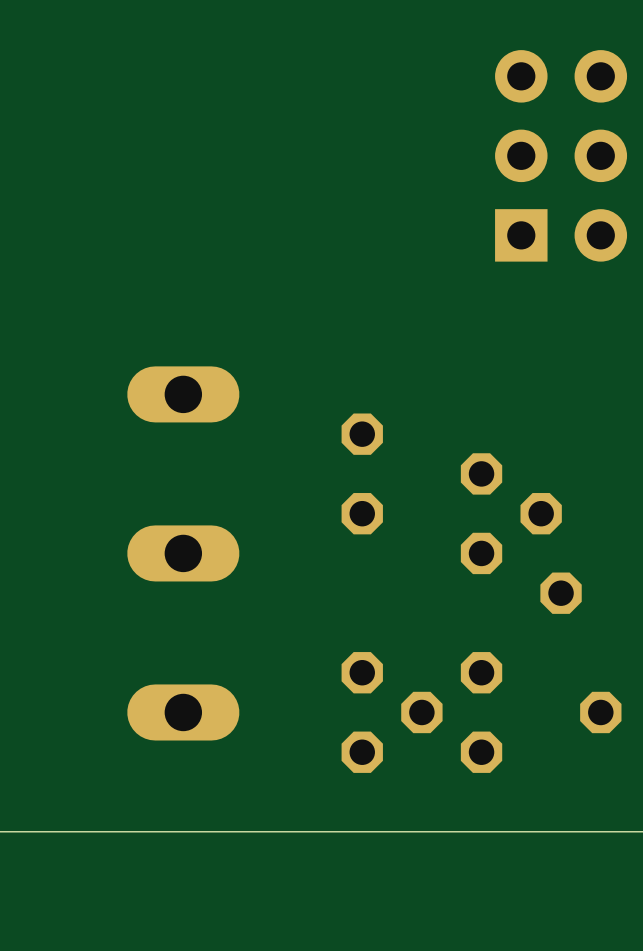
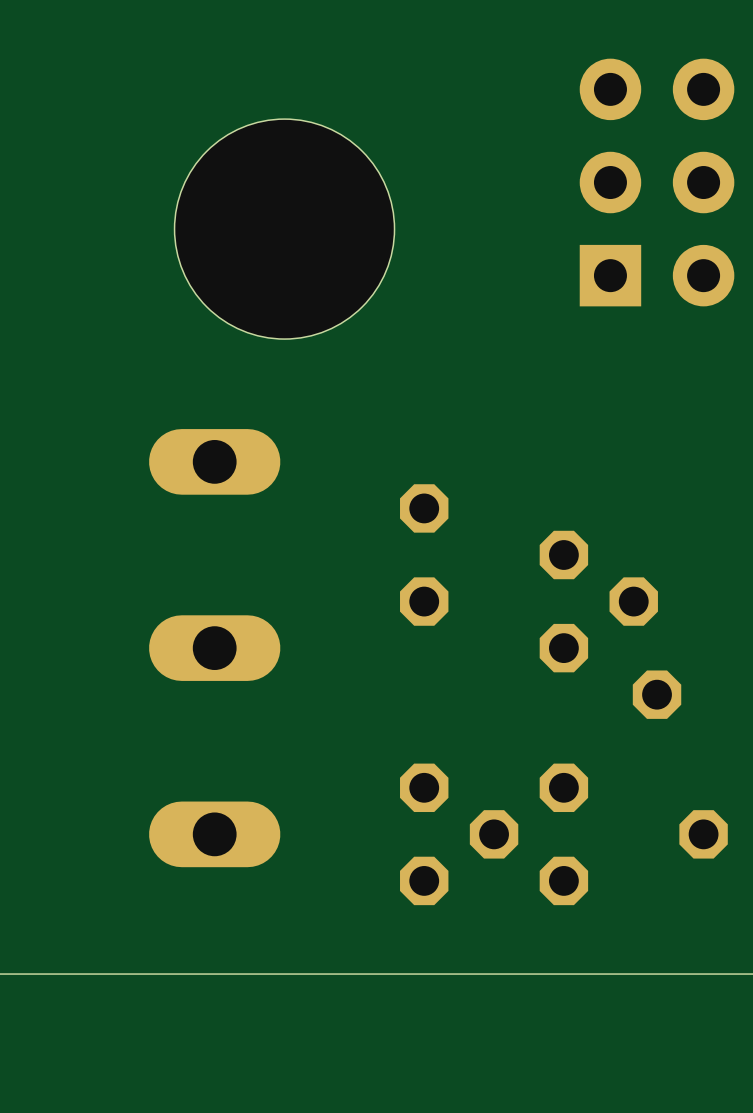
hole: none -> (284, 229)

